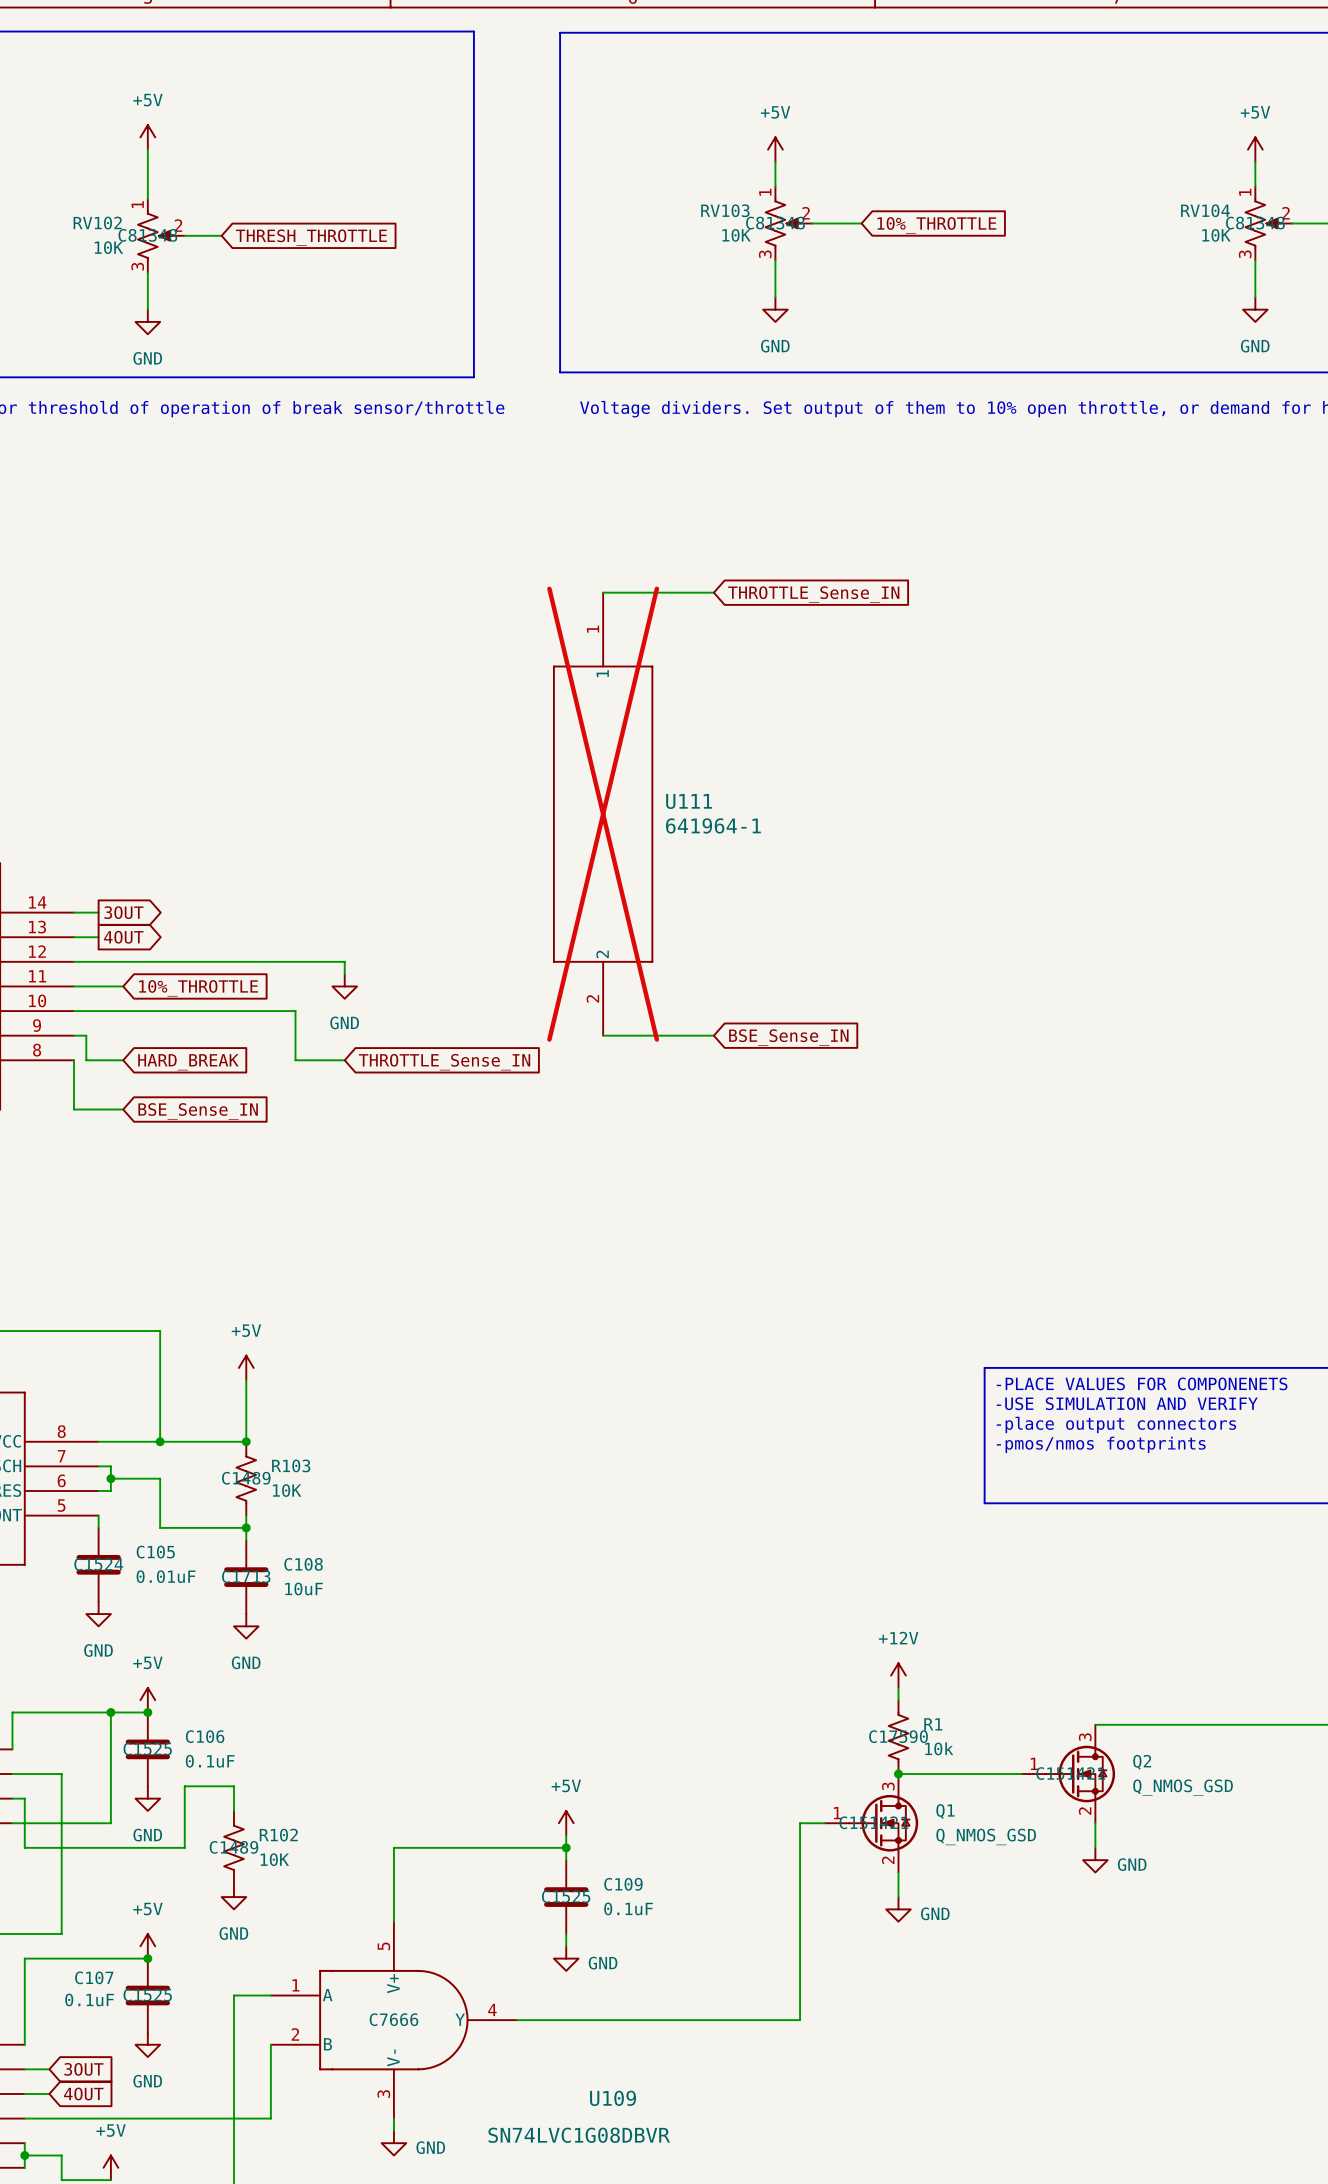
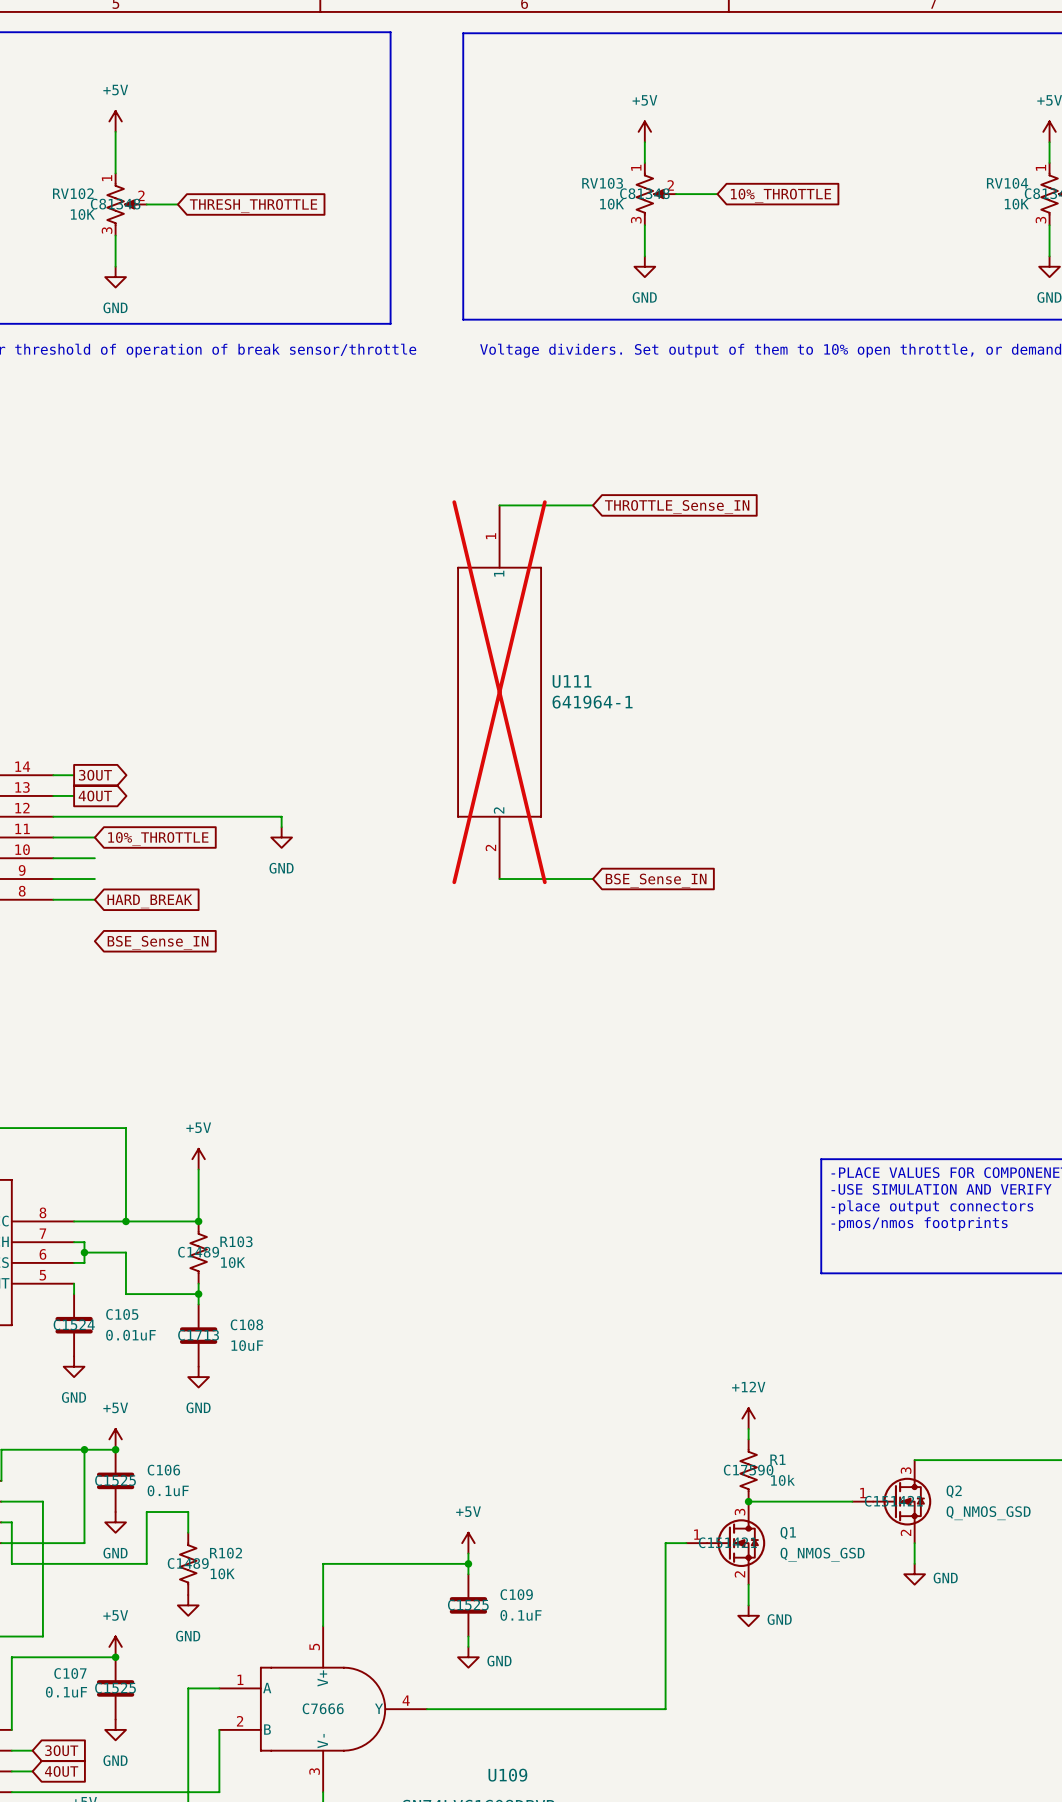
wire: (123, 1011) (295, 1011) (295, 1060) (344, 1060) -> none
wire: (86, 1035) (86, 1060) -> (53, 899) (63, 899)
wire: none -> (63, 879) (94, 879)
wire: (74, 1060) (74, 1109) (123, 1109) -> none
global label: THROTTLE_Sense_IN (444, 1062) -> none

